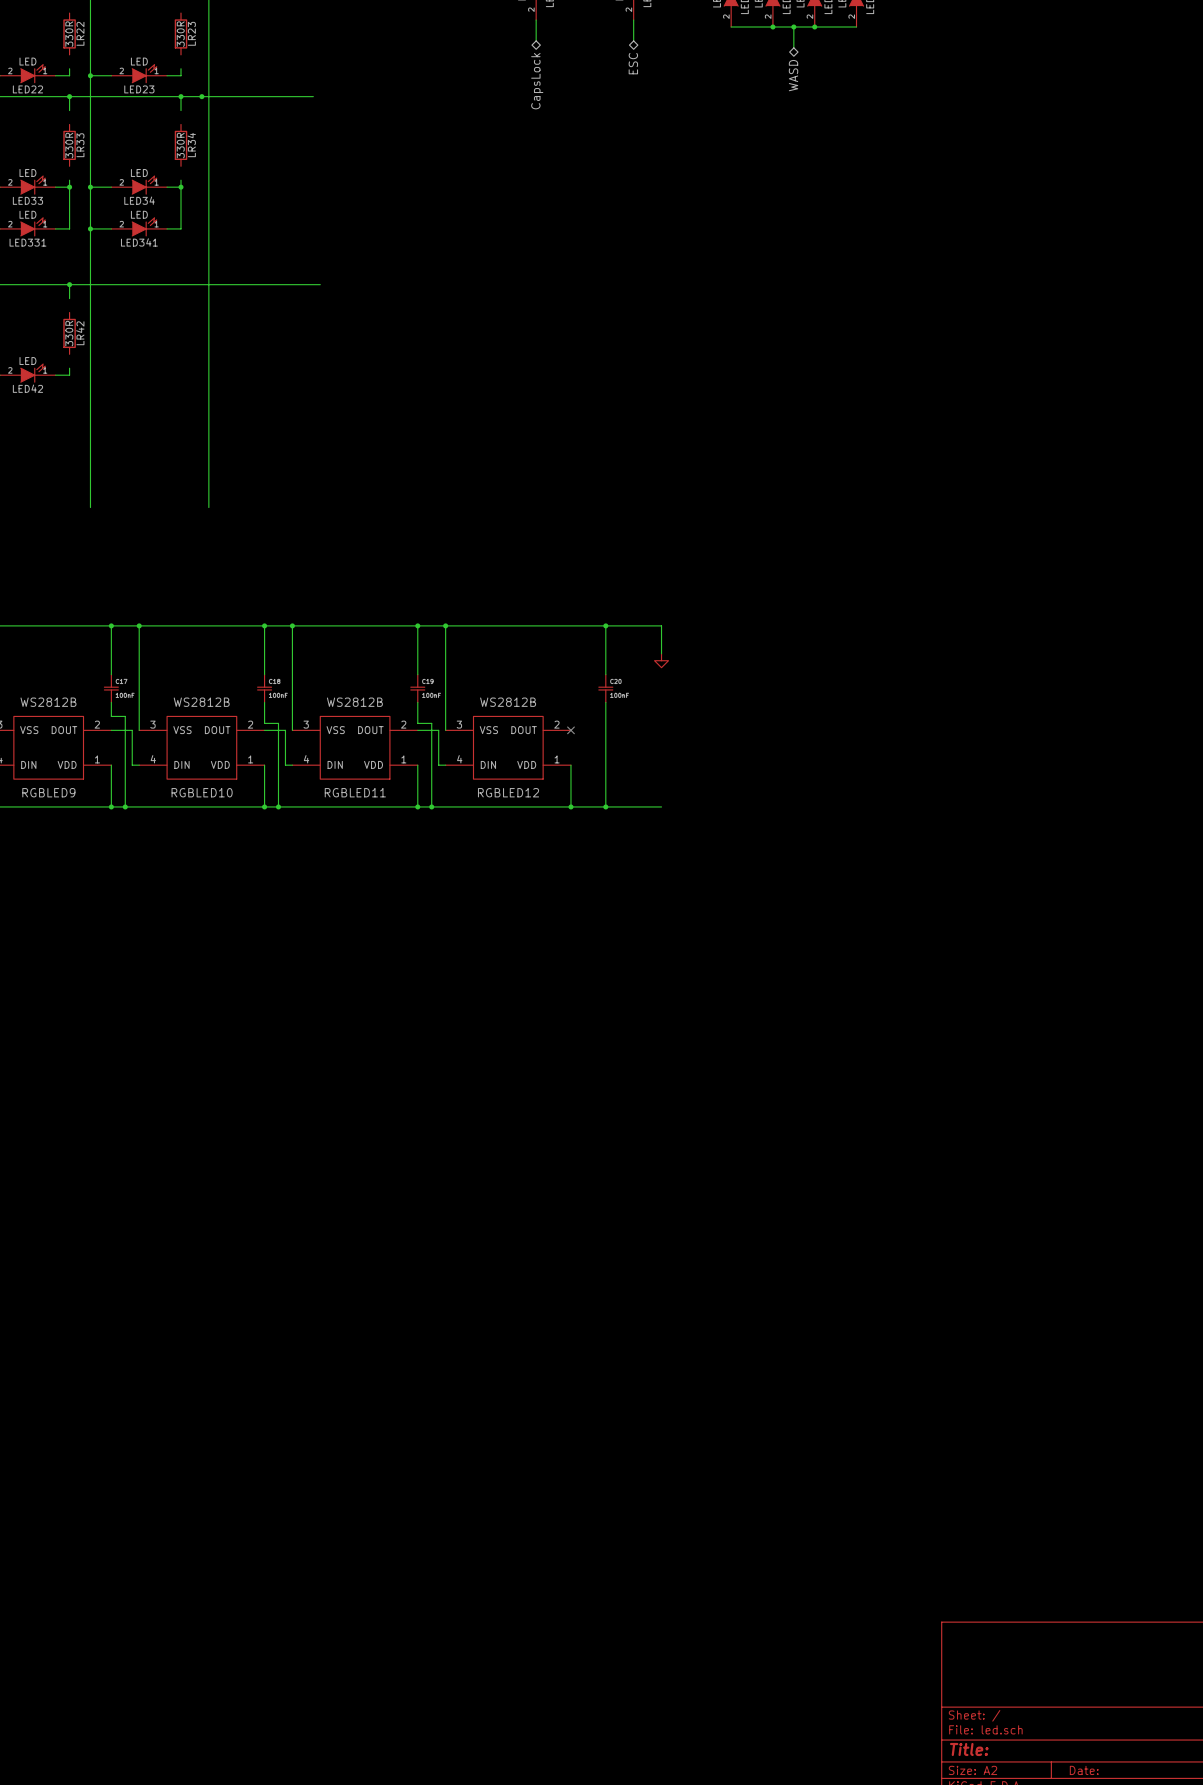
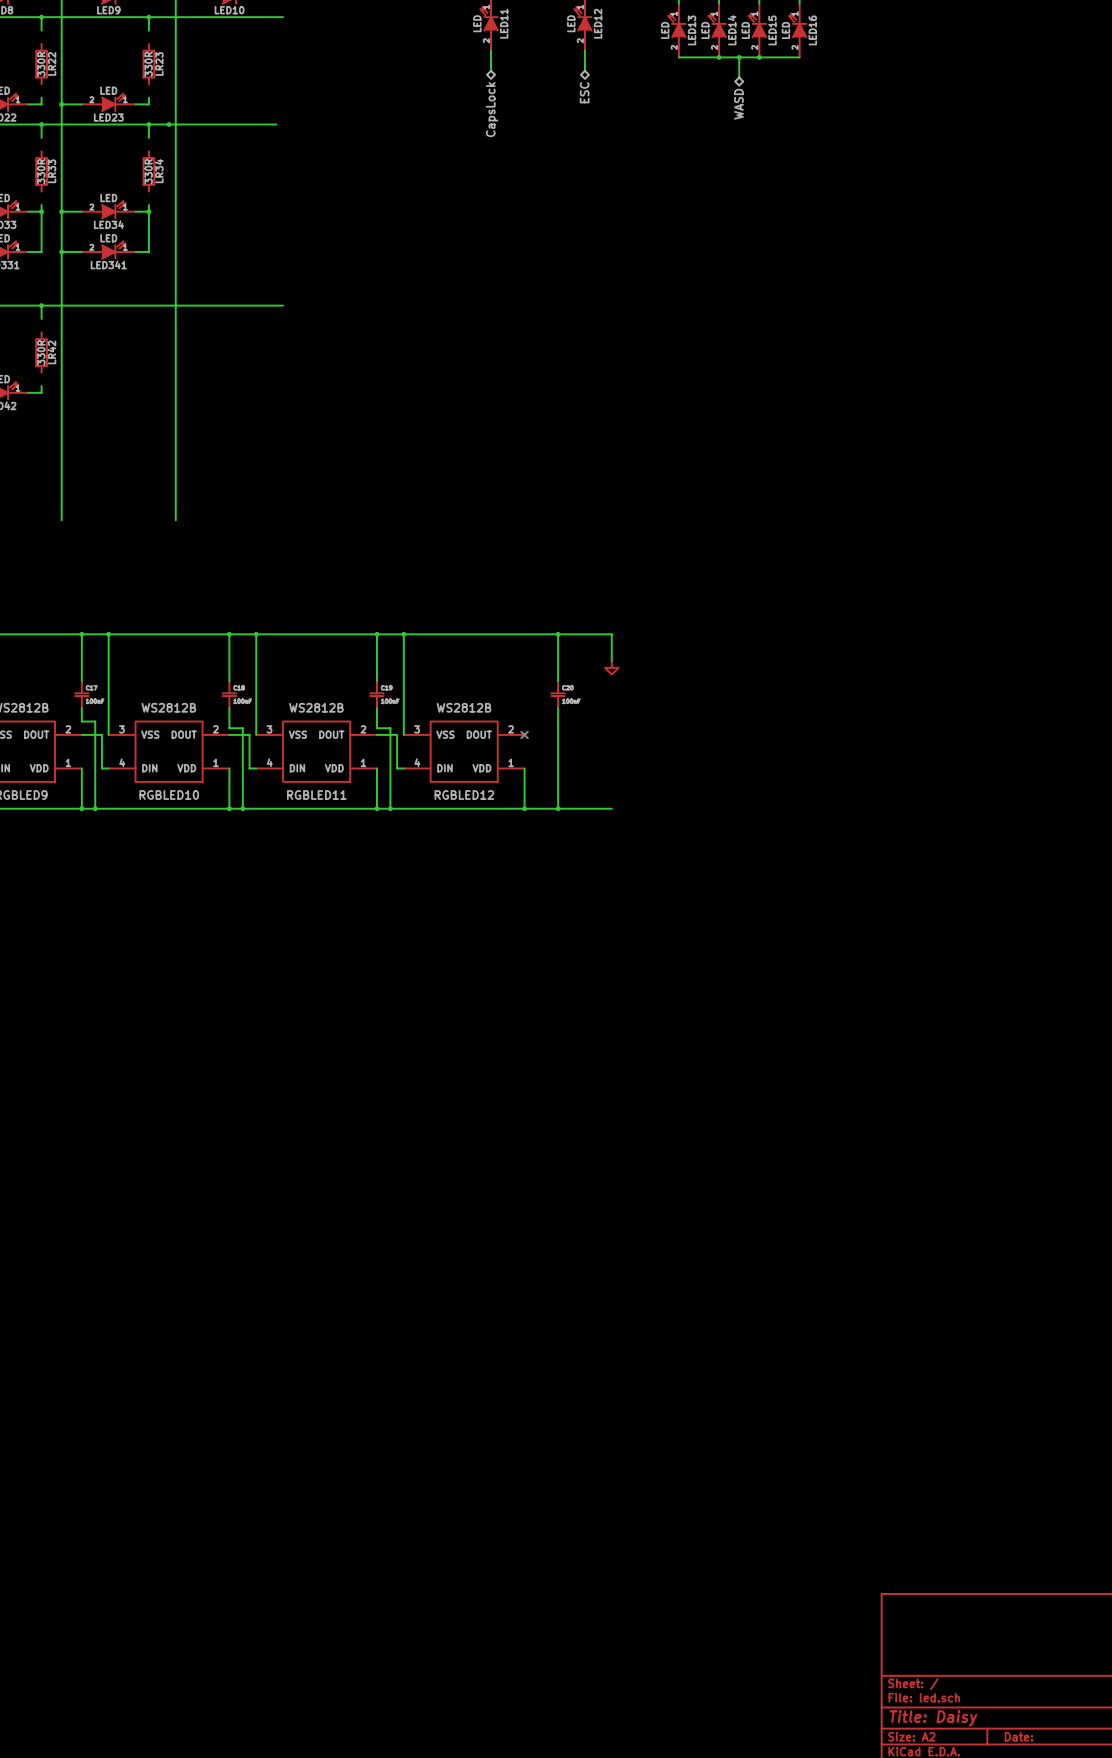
title block: Title: (969, 1749) -> Title: Daisy (933, 1718)

